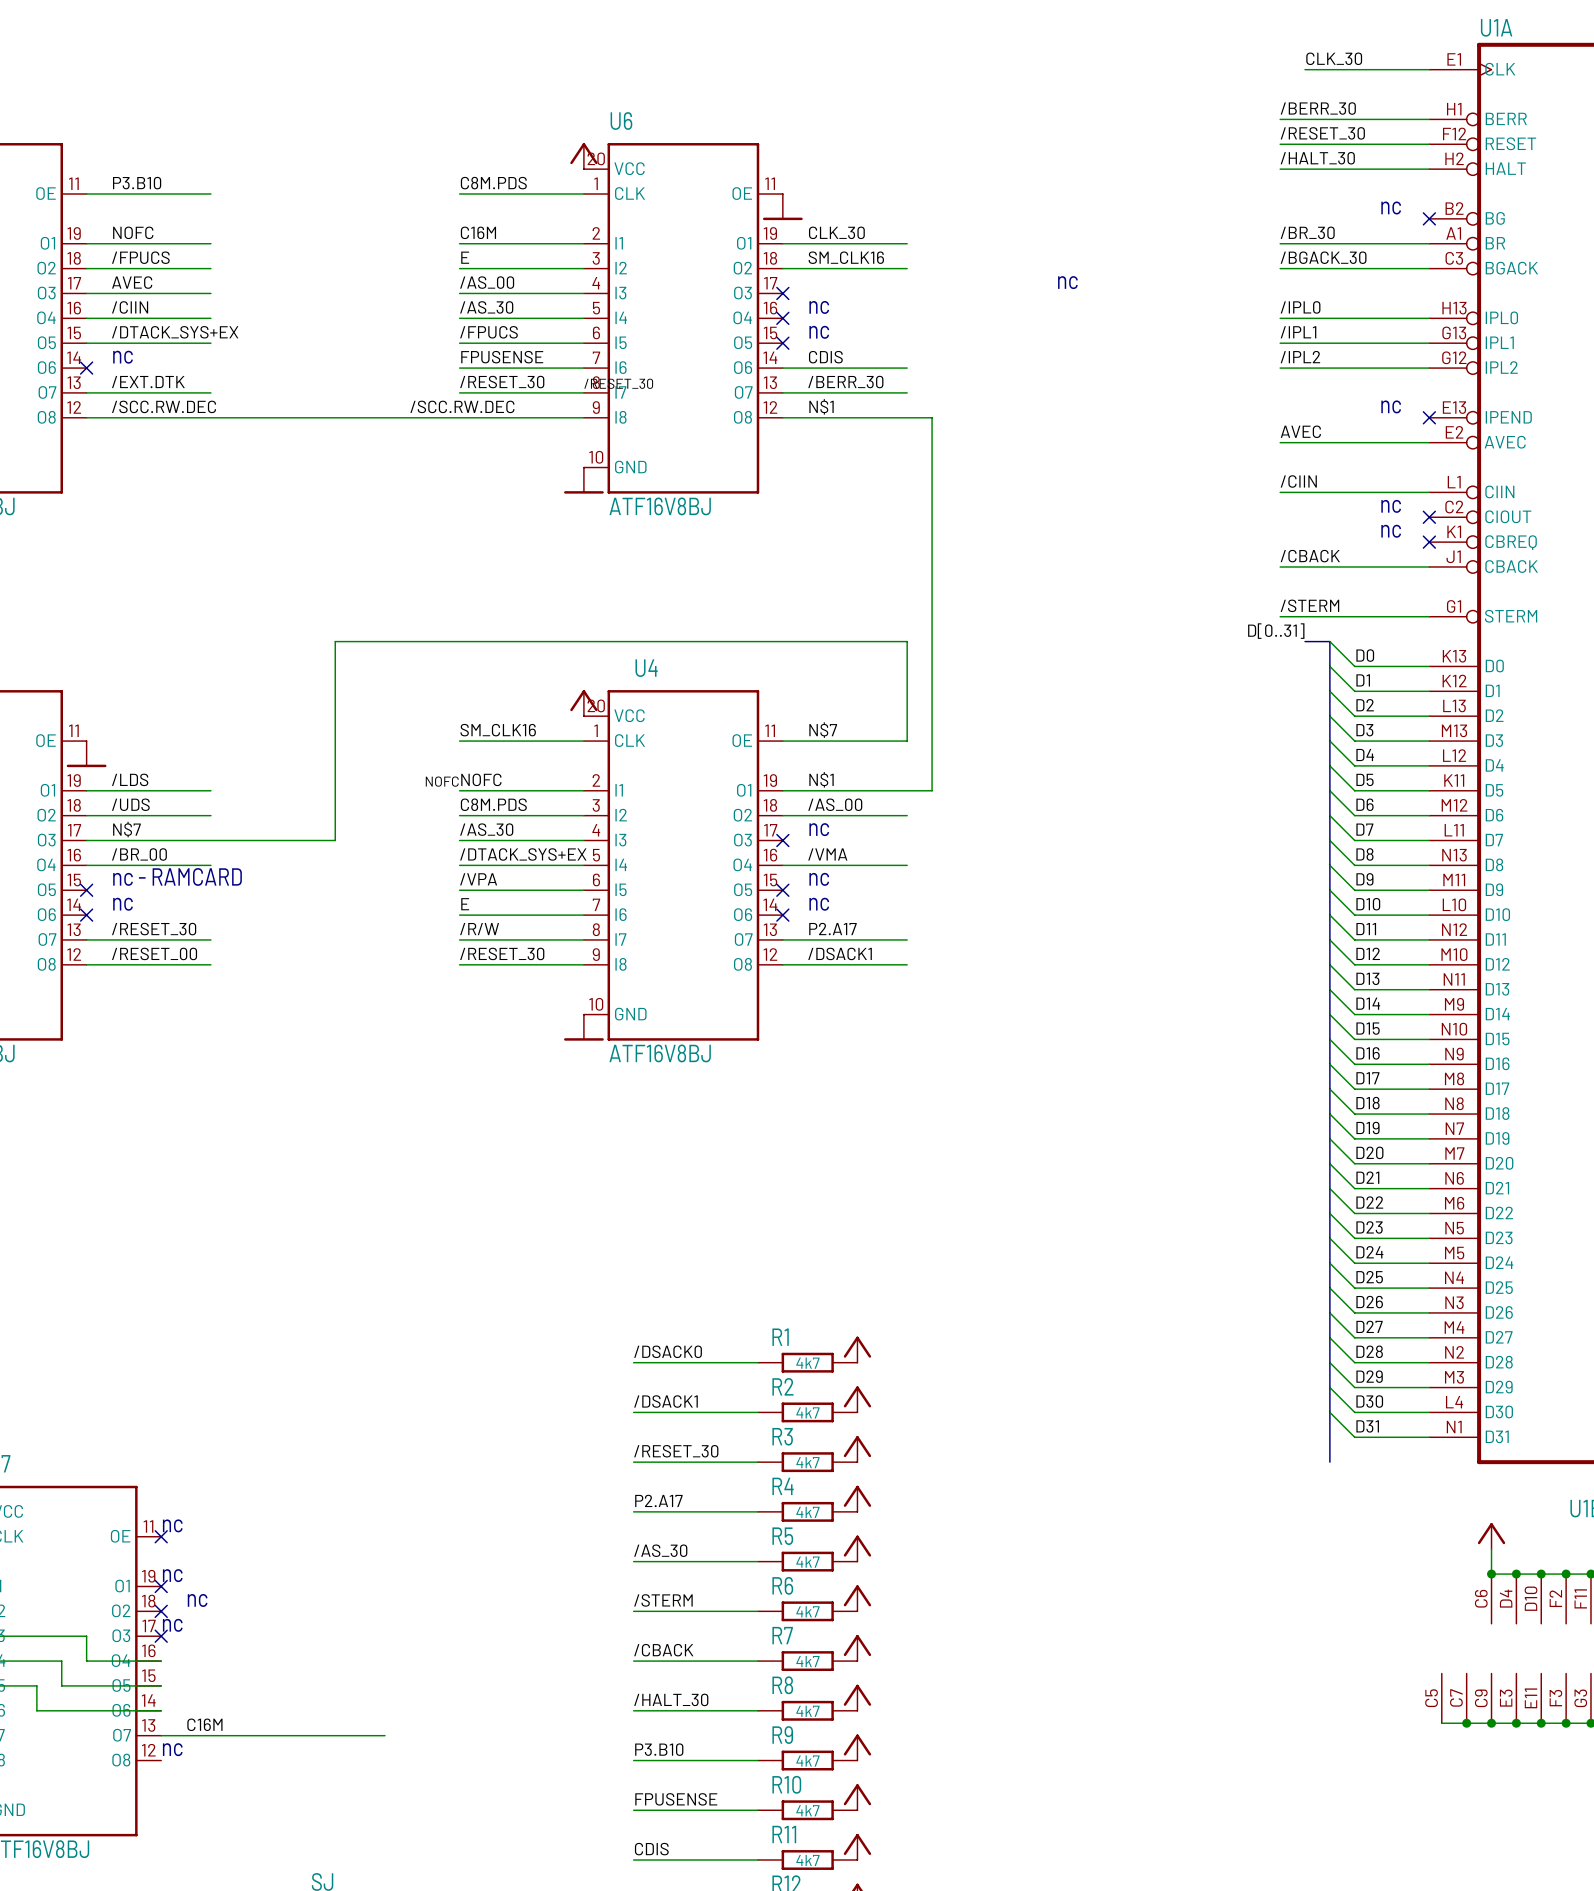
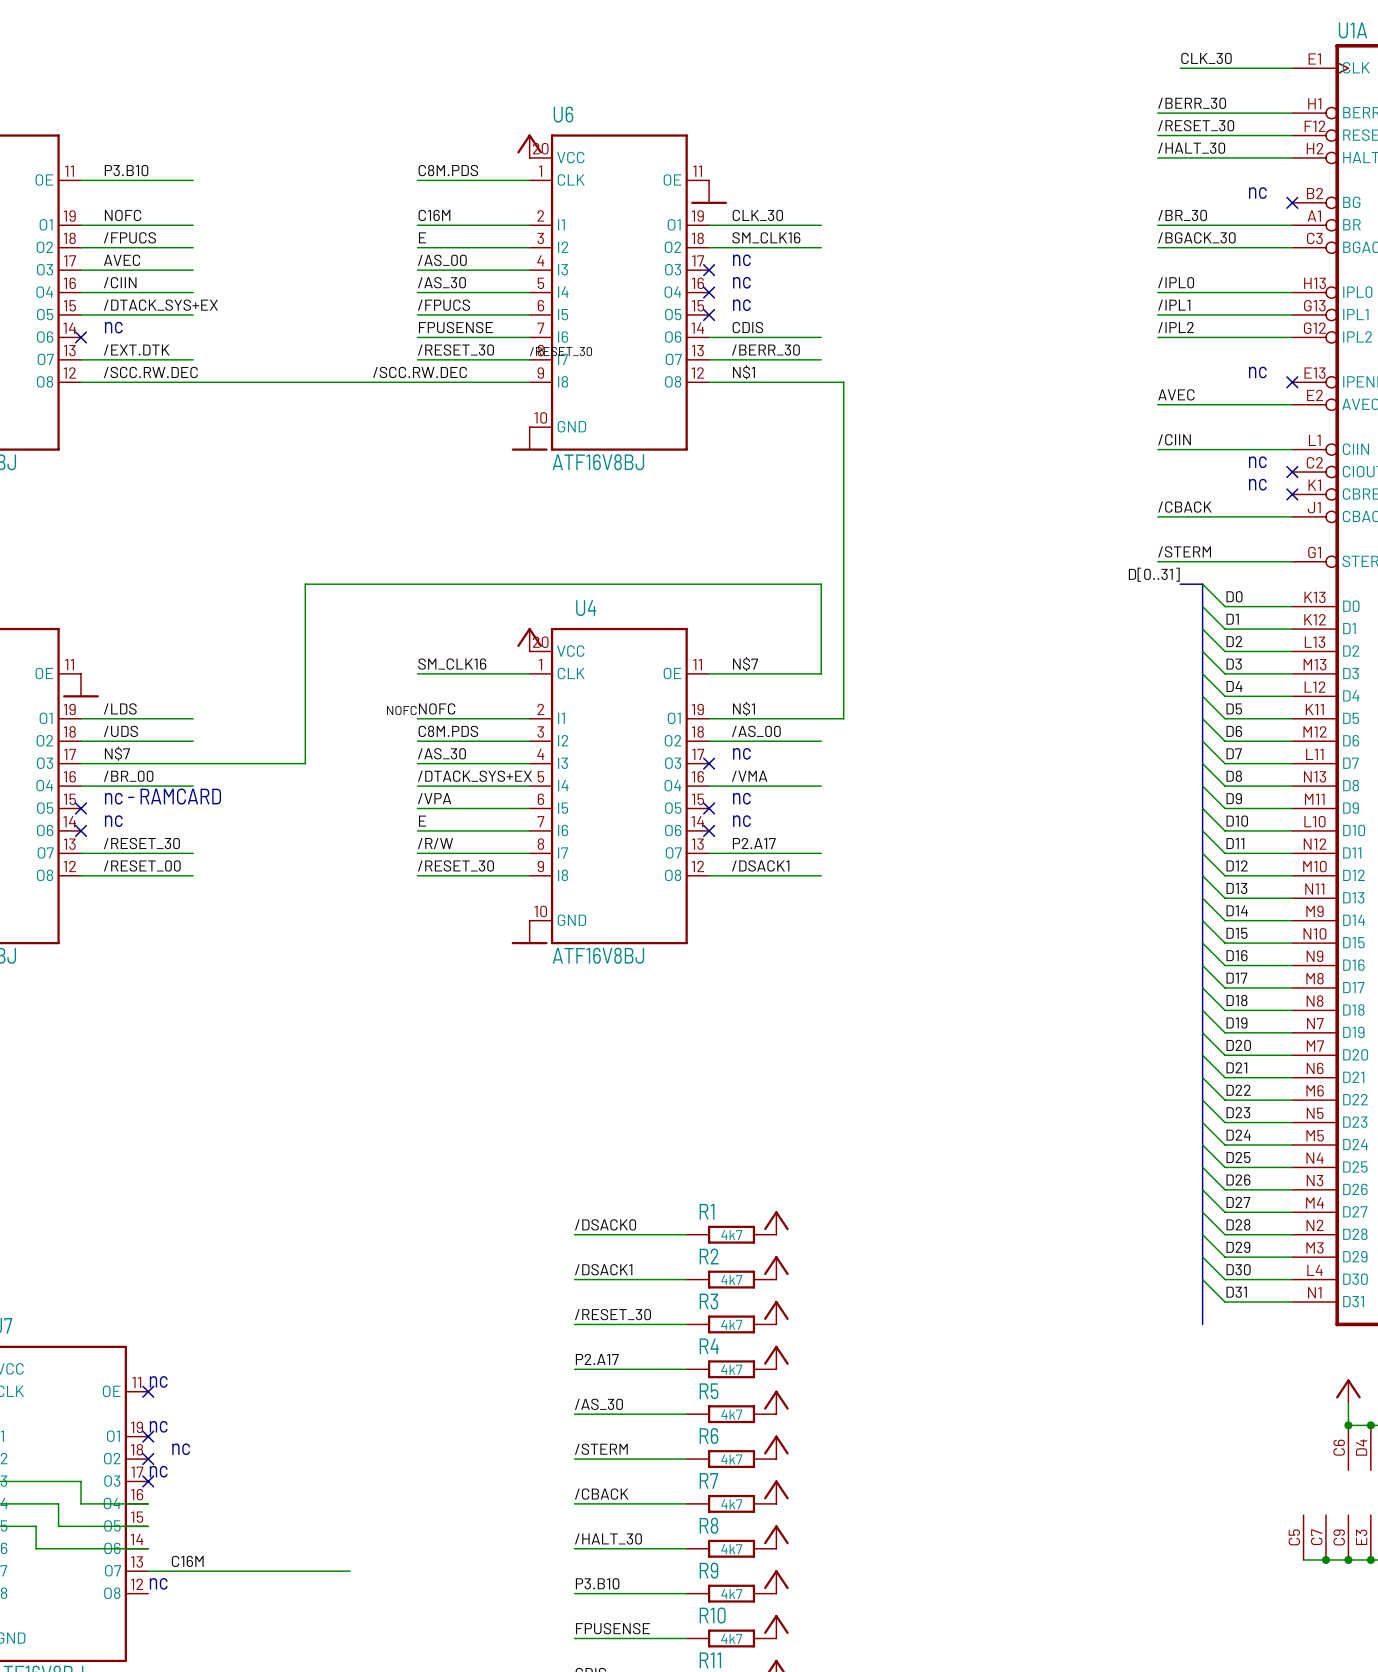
text: none -> nc (741, 260)
text: nc (1067, 282) -> none

